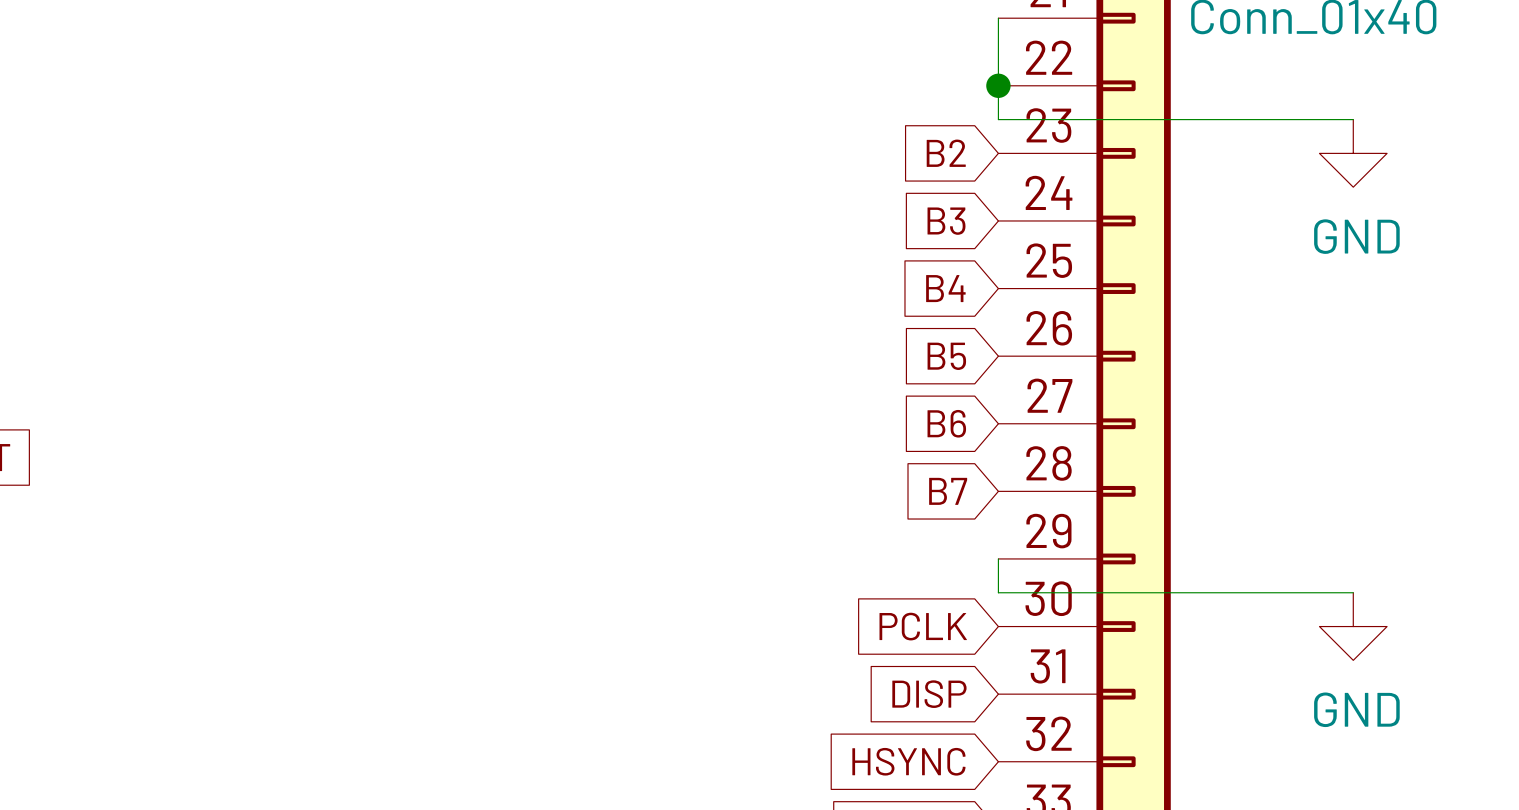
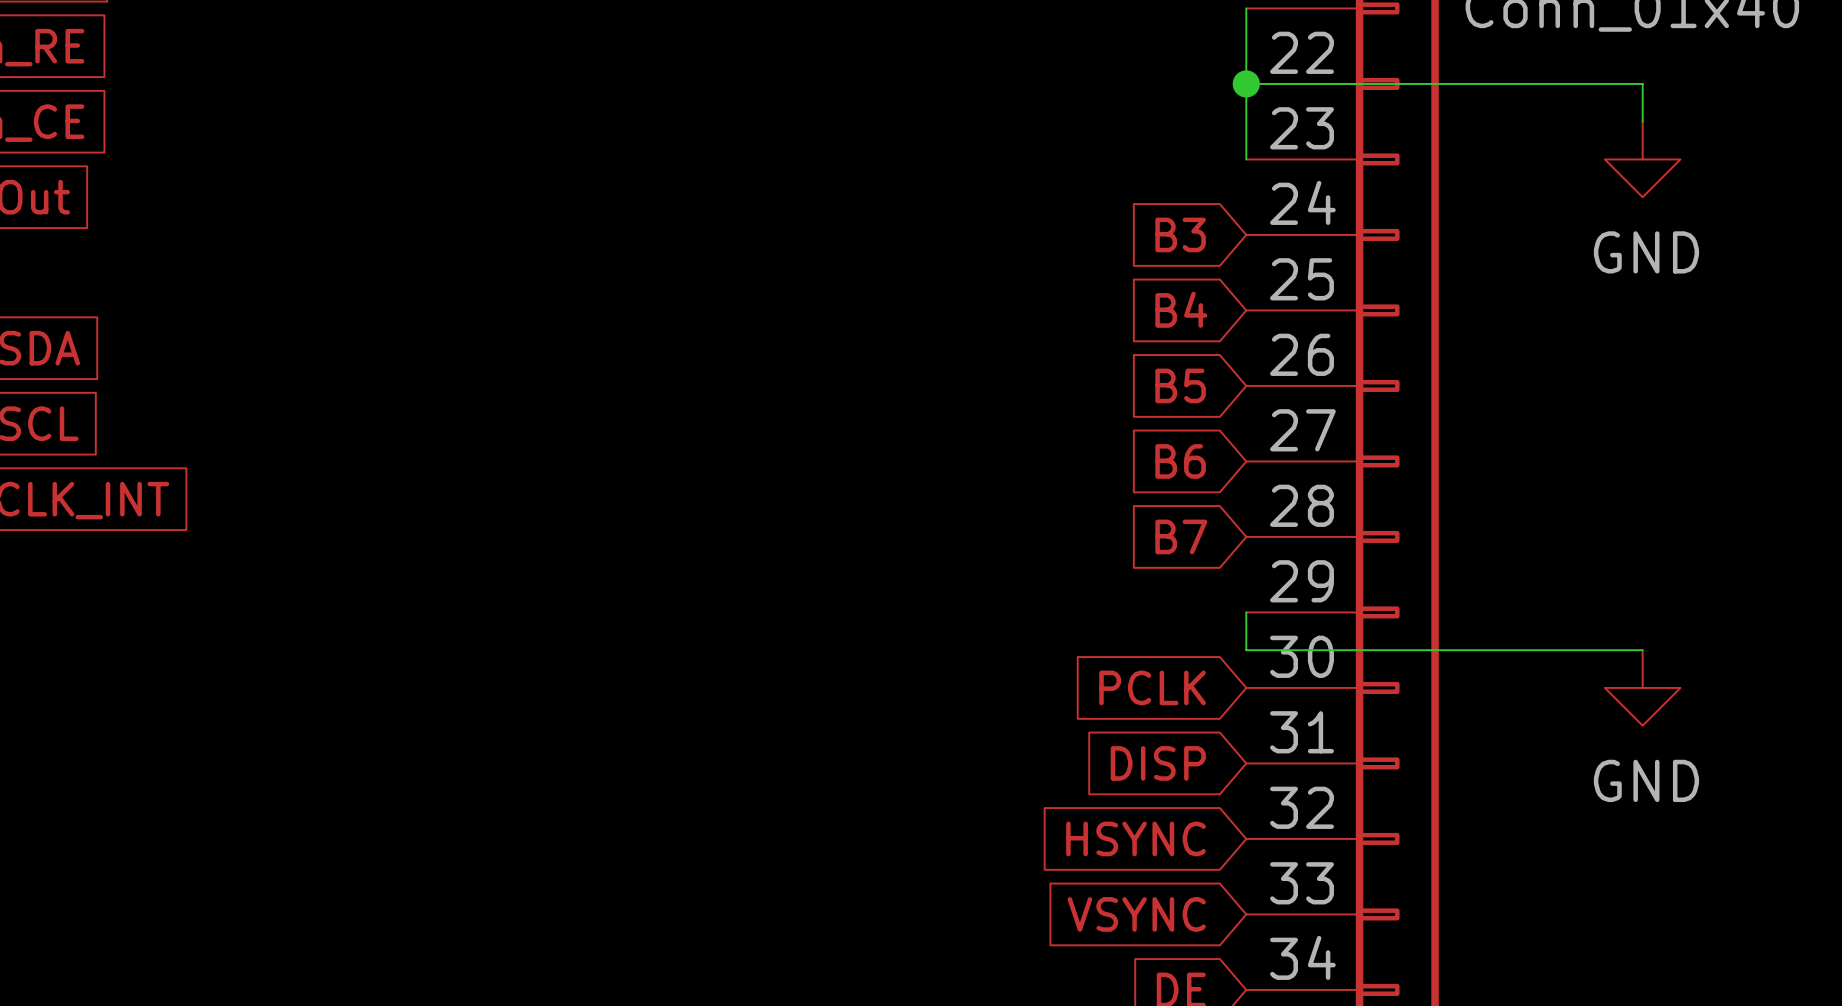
wire: (998, 119) (1353, 119) -> (1246, 83) (1642, 83) (1642, 121)
wire: none -> (1246, 121) (1246, 159)
global label: B2 (946, 153) -> none

